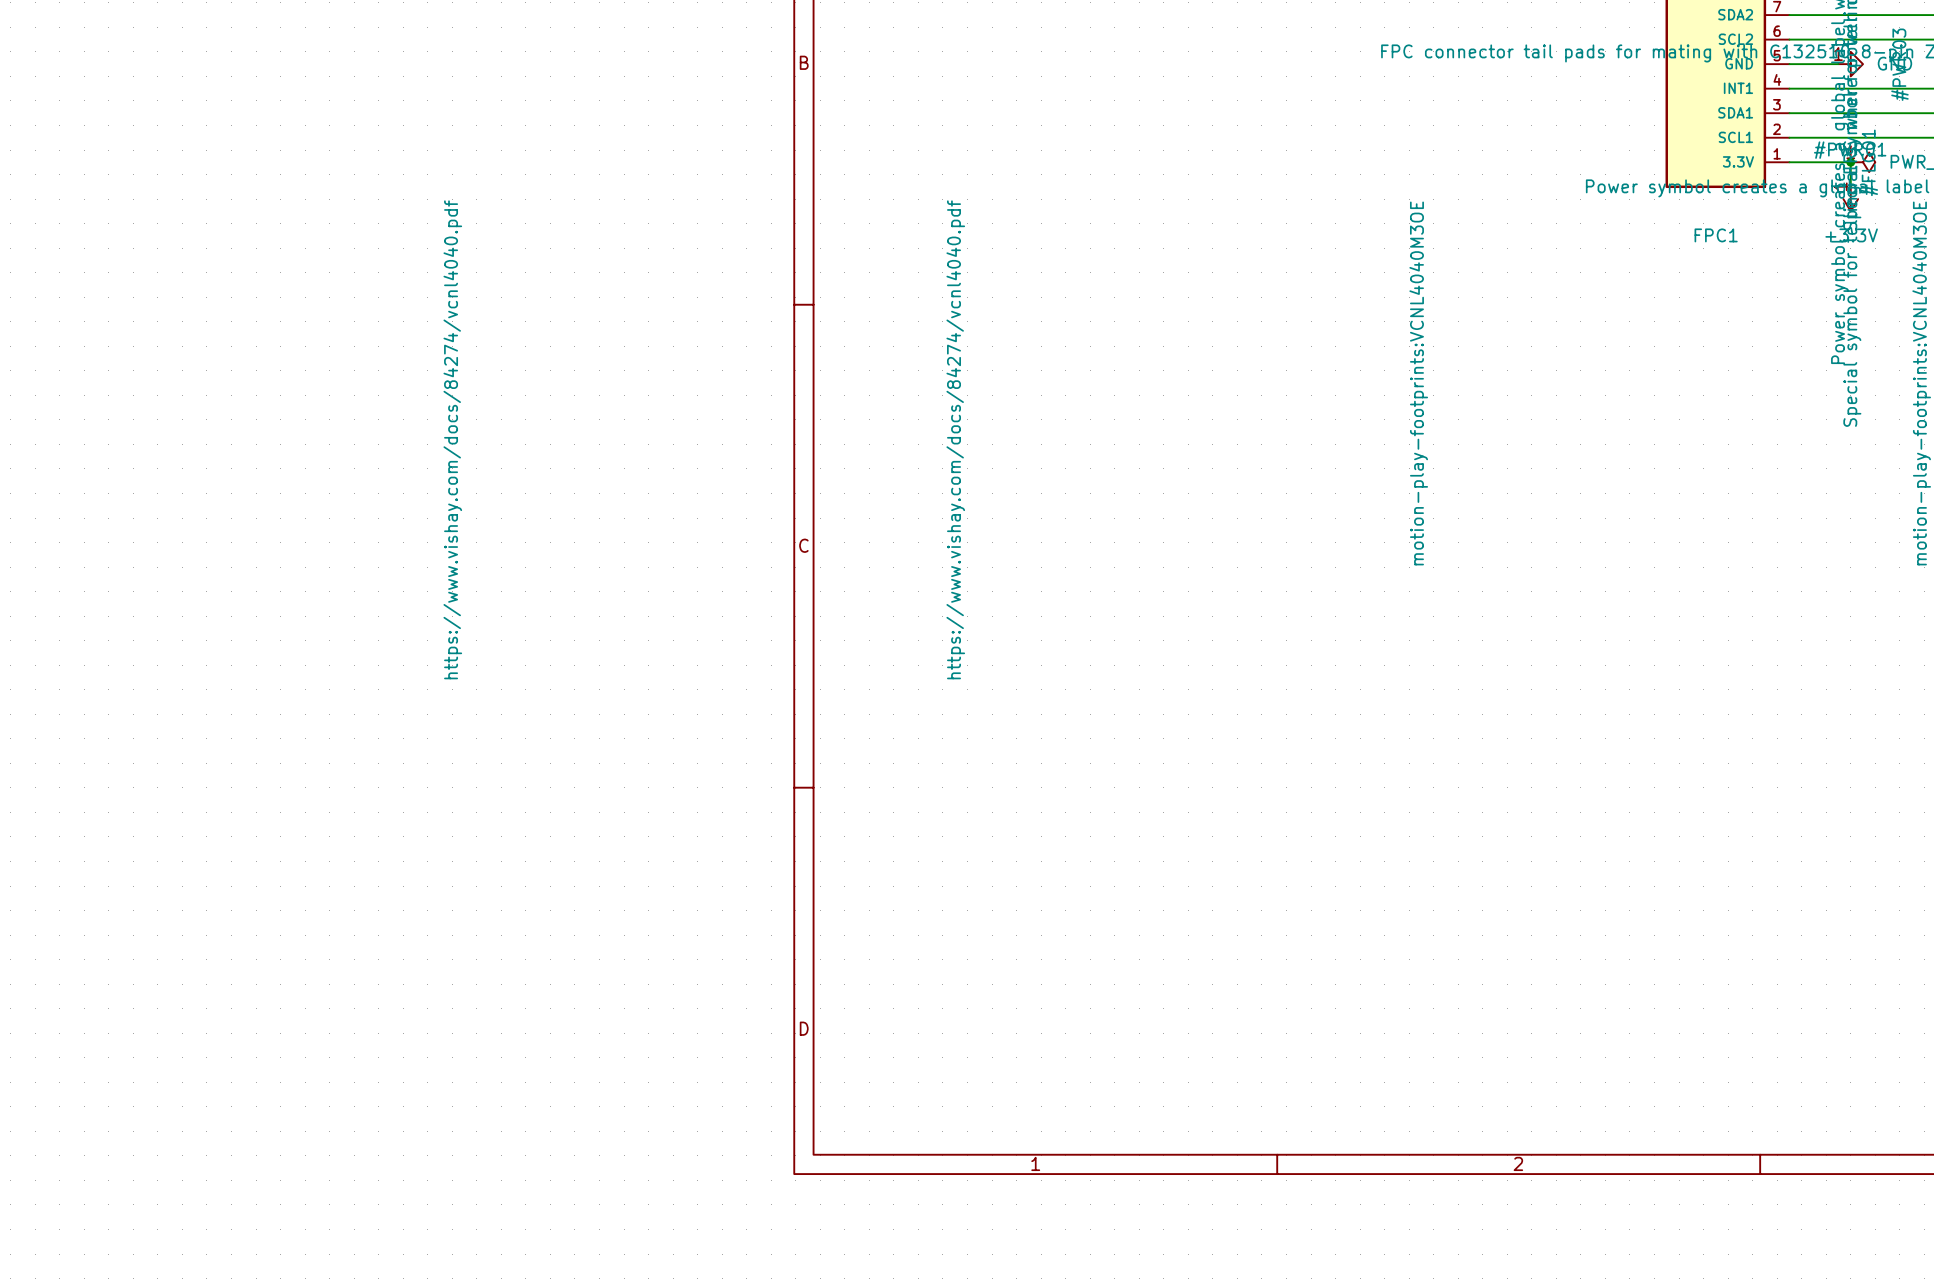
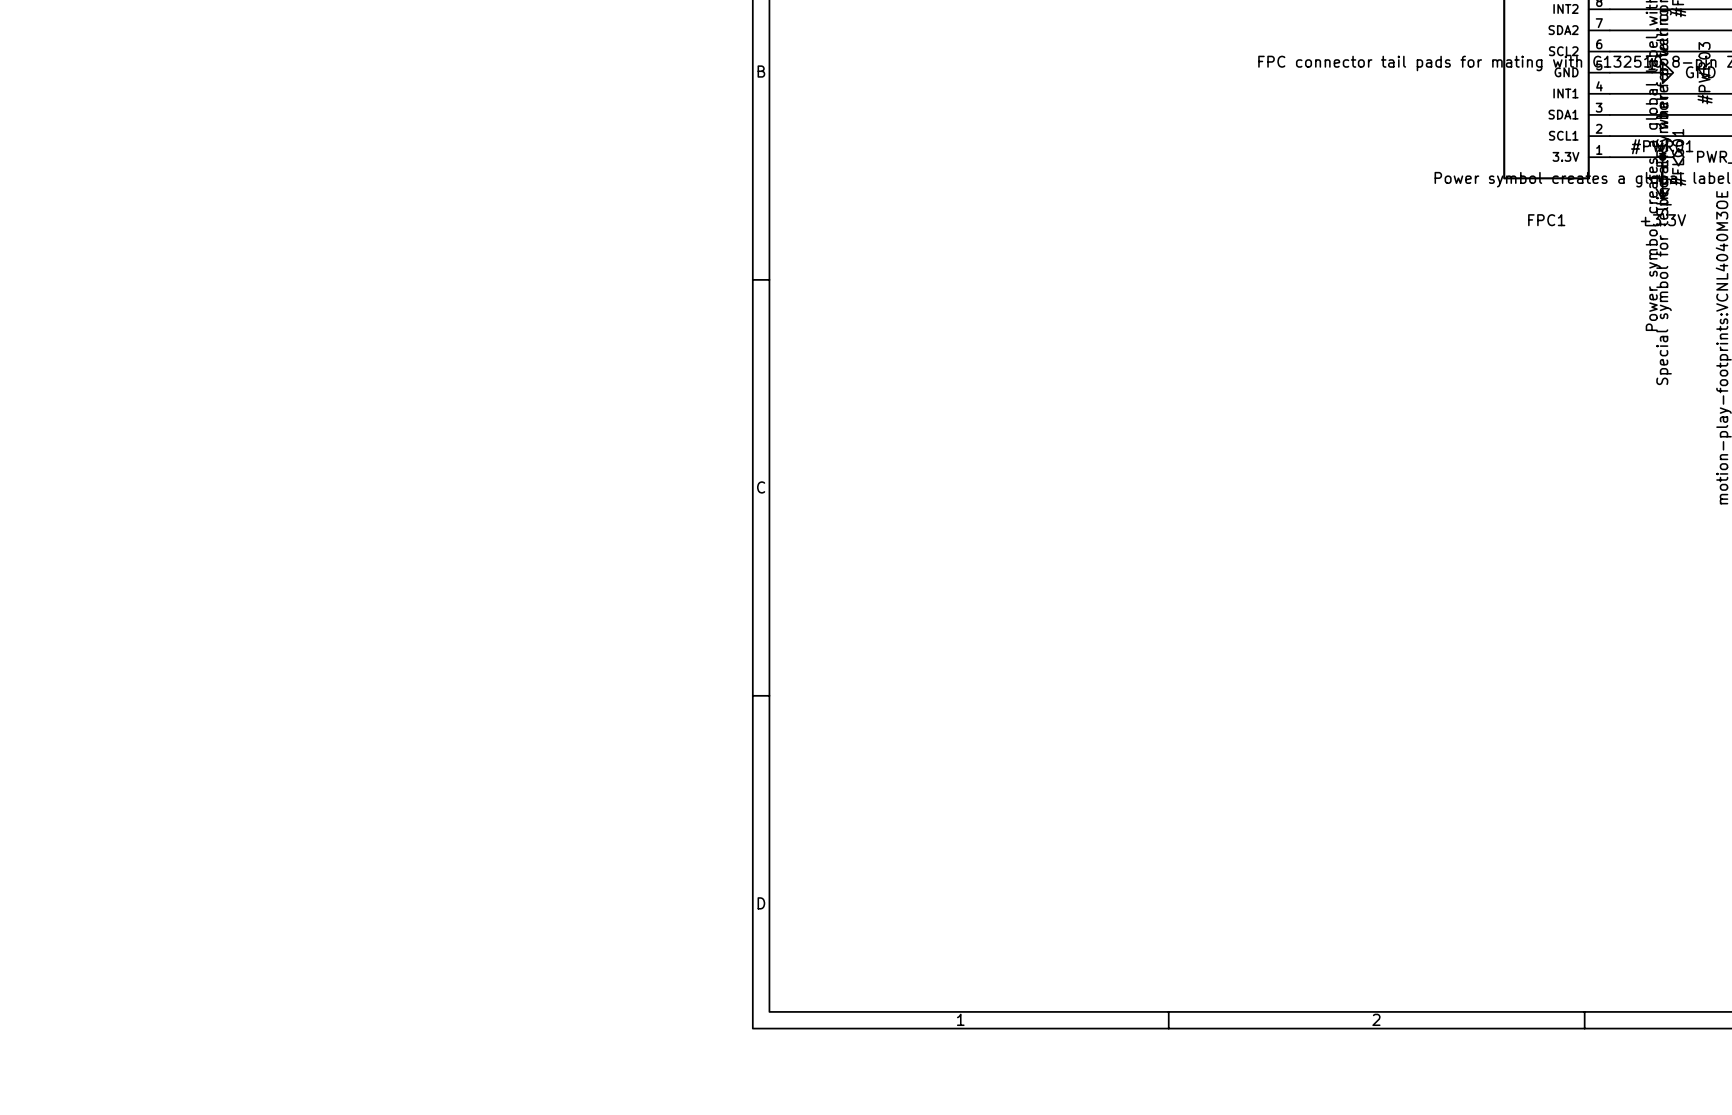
part text: motion-play-footprints:VCNL4040M3OE (1418, 383) -> none
part text: https://www.vishay.com/docs/84274/vcnl4040.pdf (452, 439) -> none
part text: https://www.vishay.com/docs/84274/vcnl4040.pdf (955, 439) -> none

